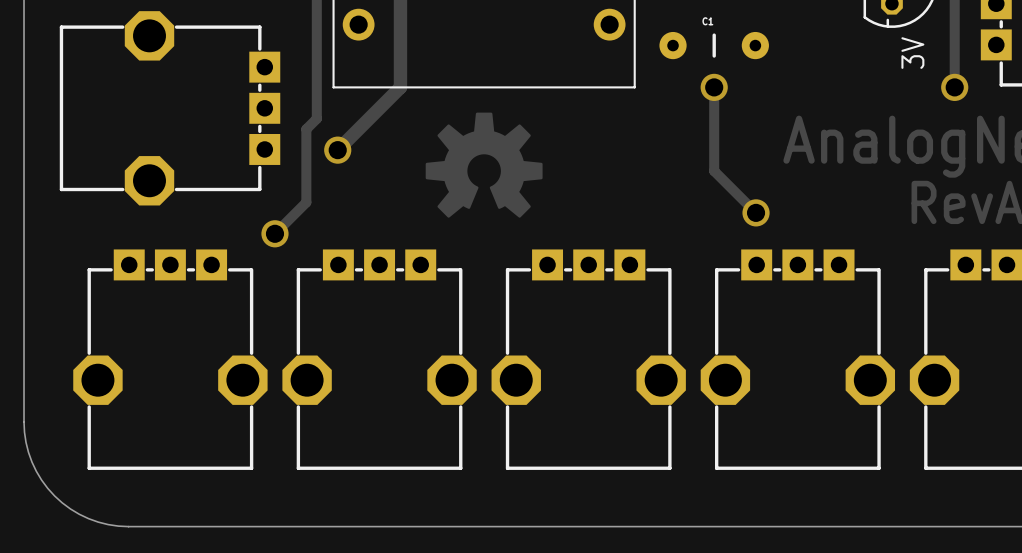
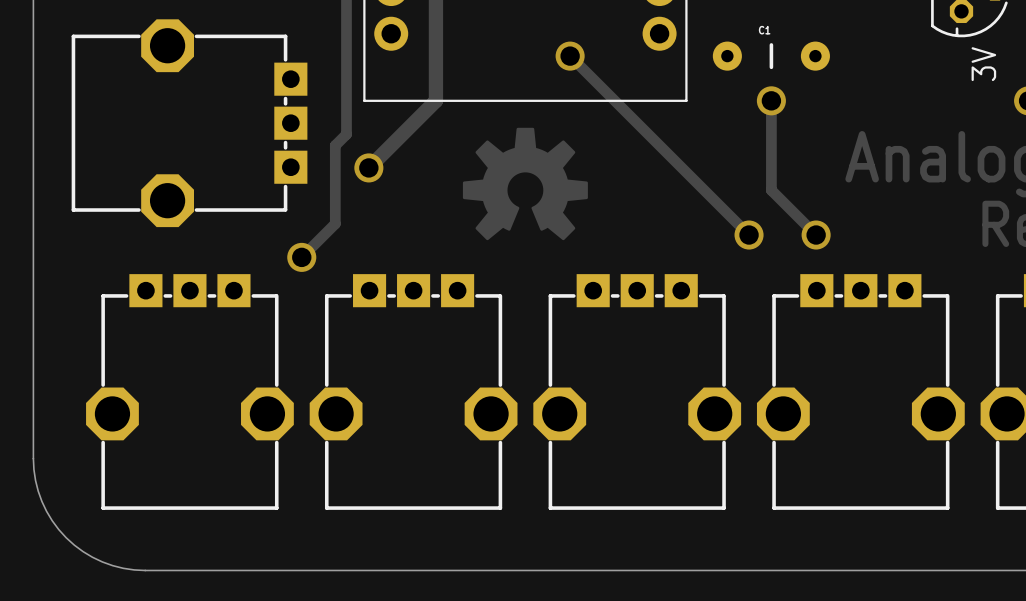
track: none -> (570, 56) (749, 235)
via: none -> (570, 56)
via: none -> (749, 235)

